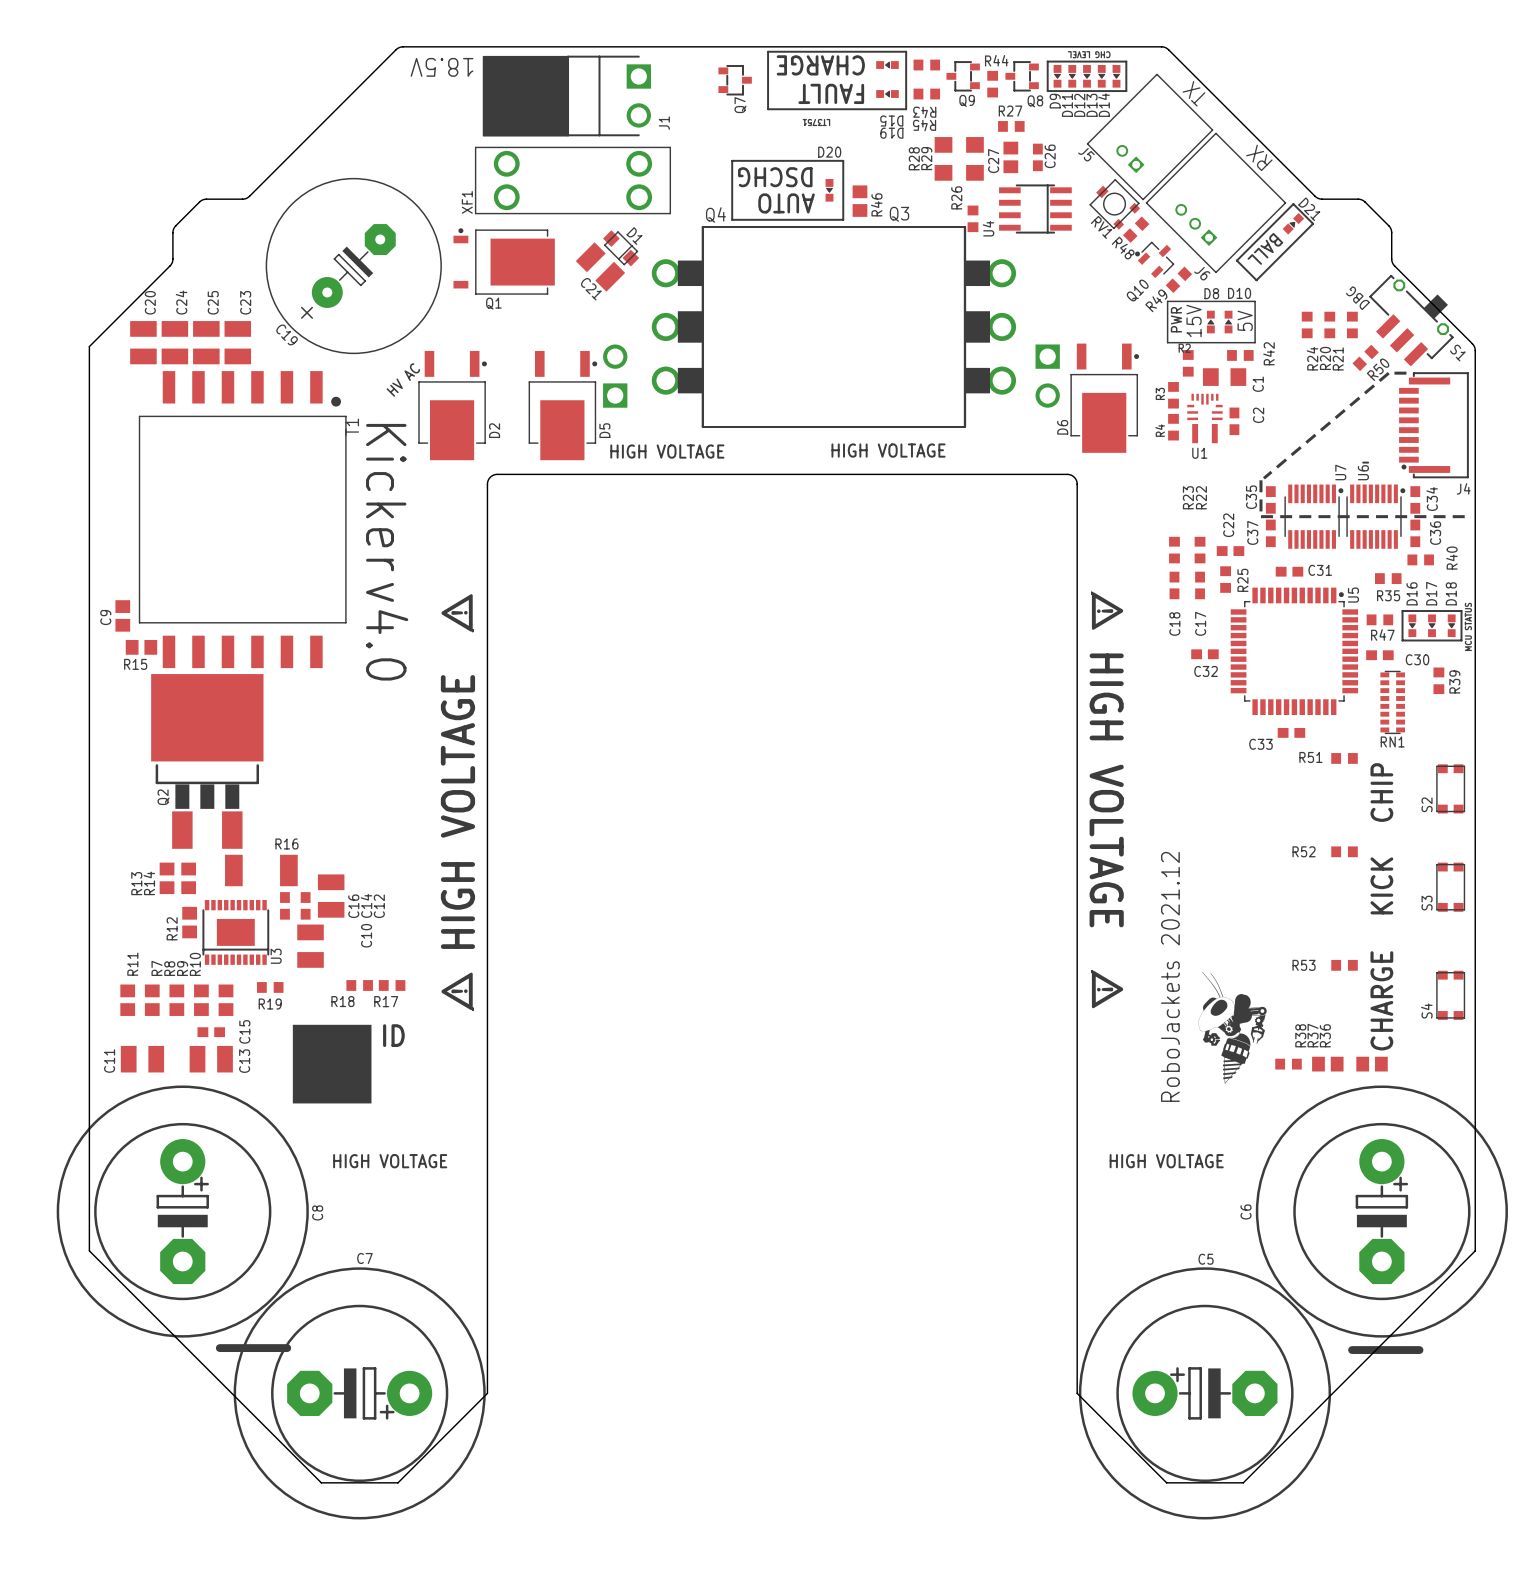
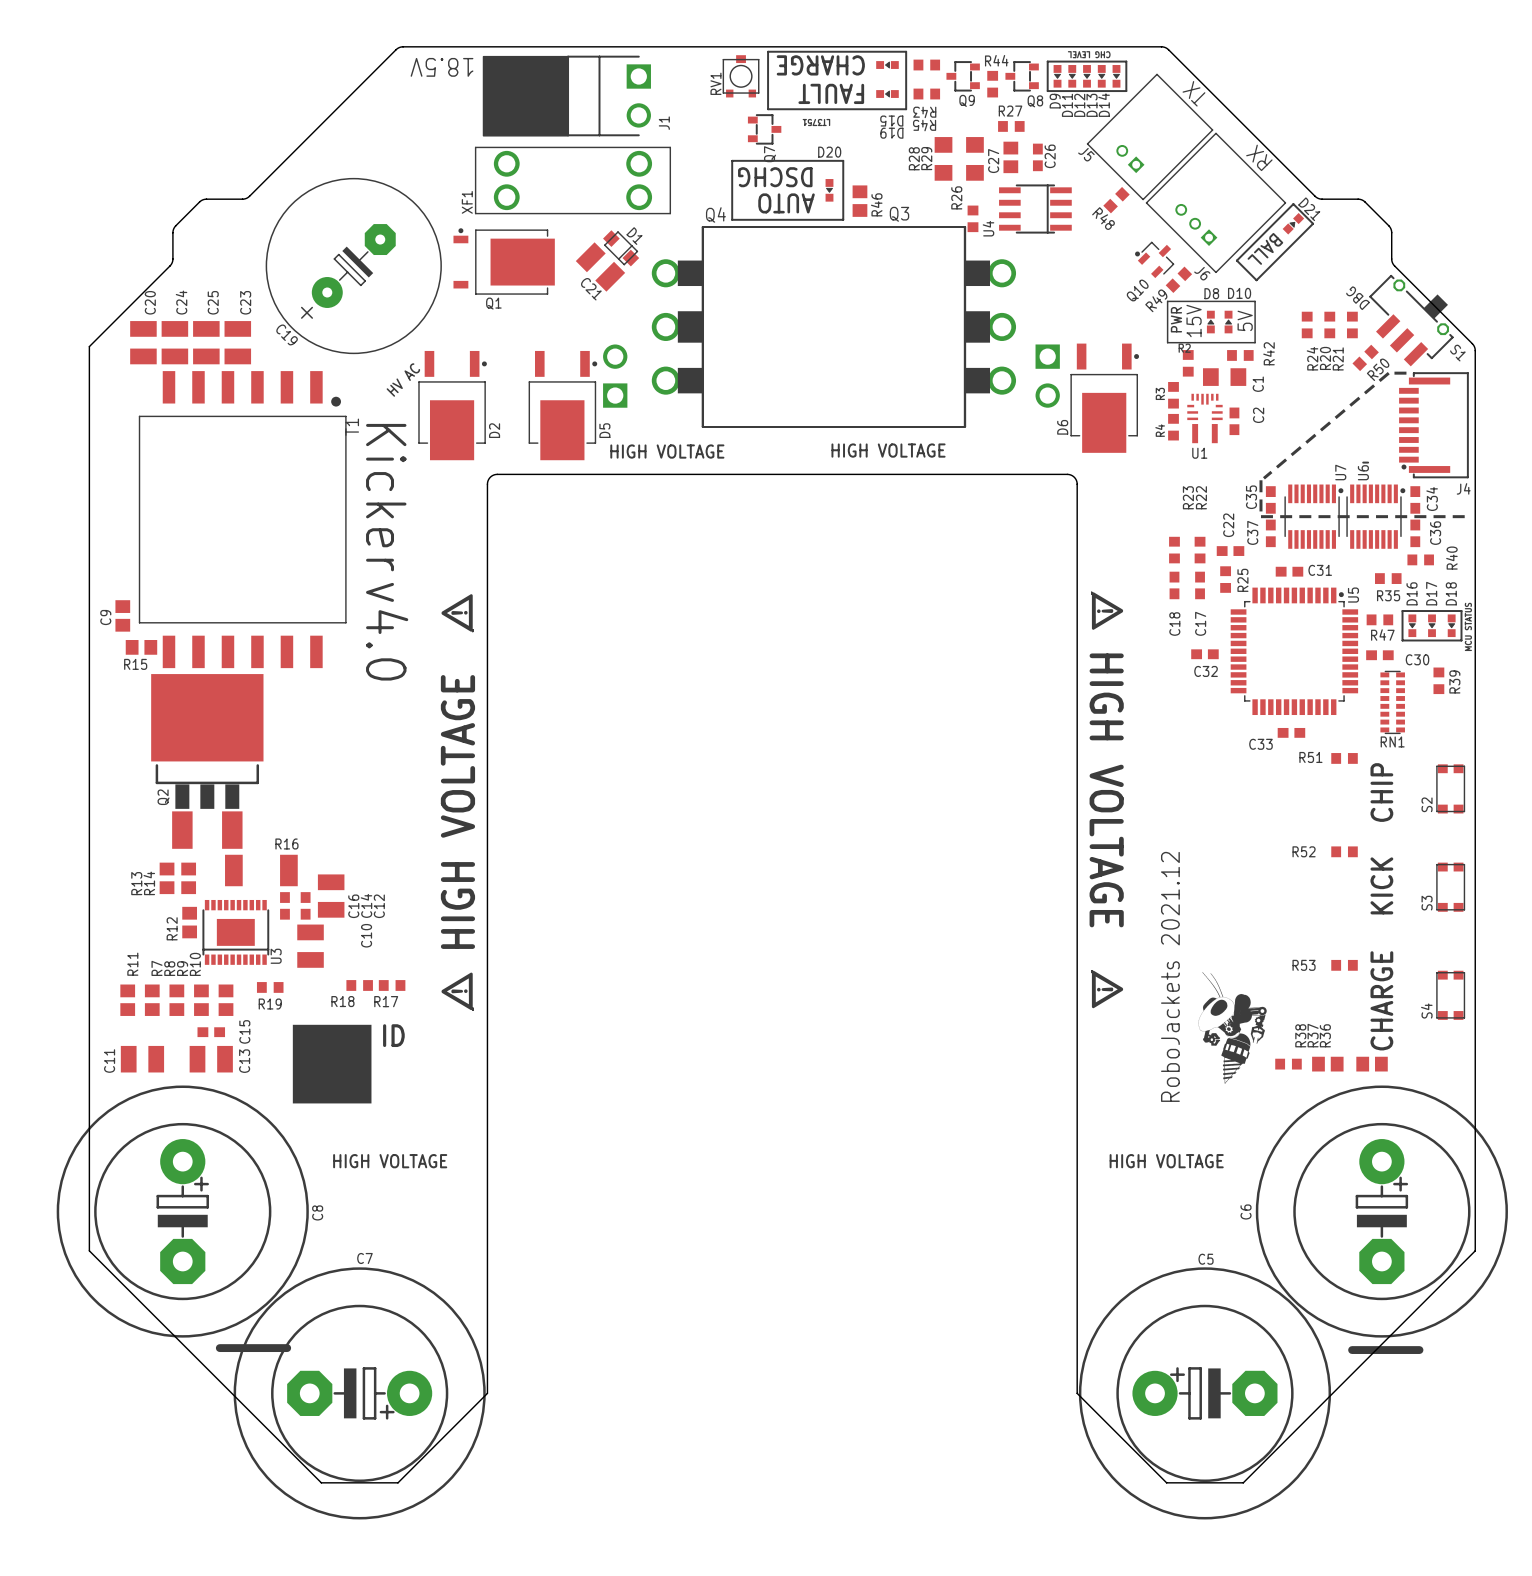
Q7 position: (735, 80) -> (764, 129)
RV1 rotation: 0° (1114, 204) -> 45° clockwise (741, 76)
RV1 position: (1114, 204) -> (741, 76)
R48 position: (1136, 229) -> (1116, 200)

